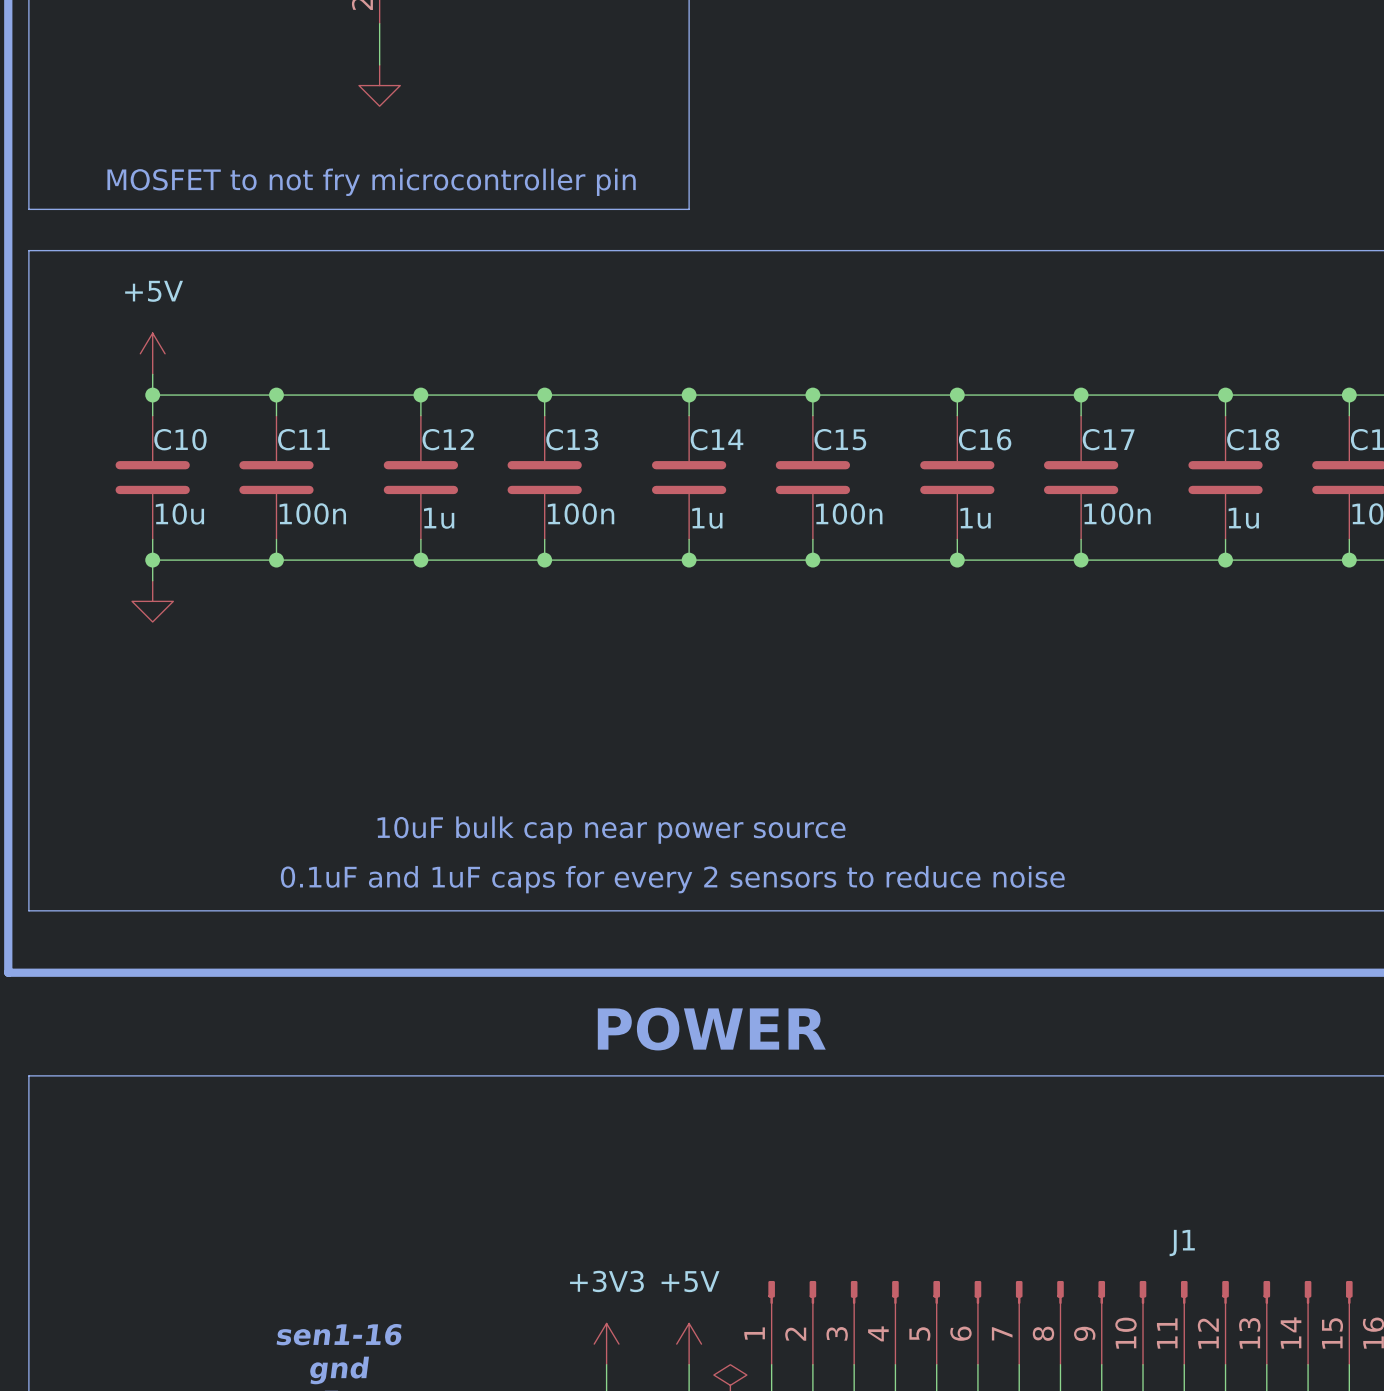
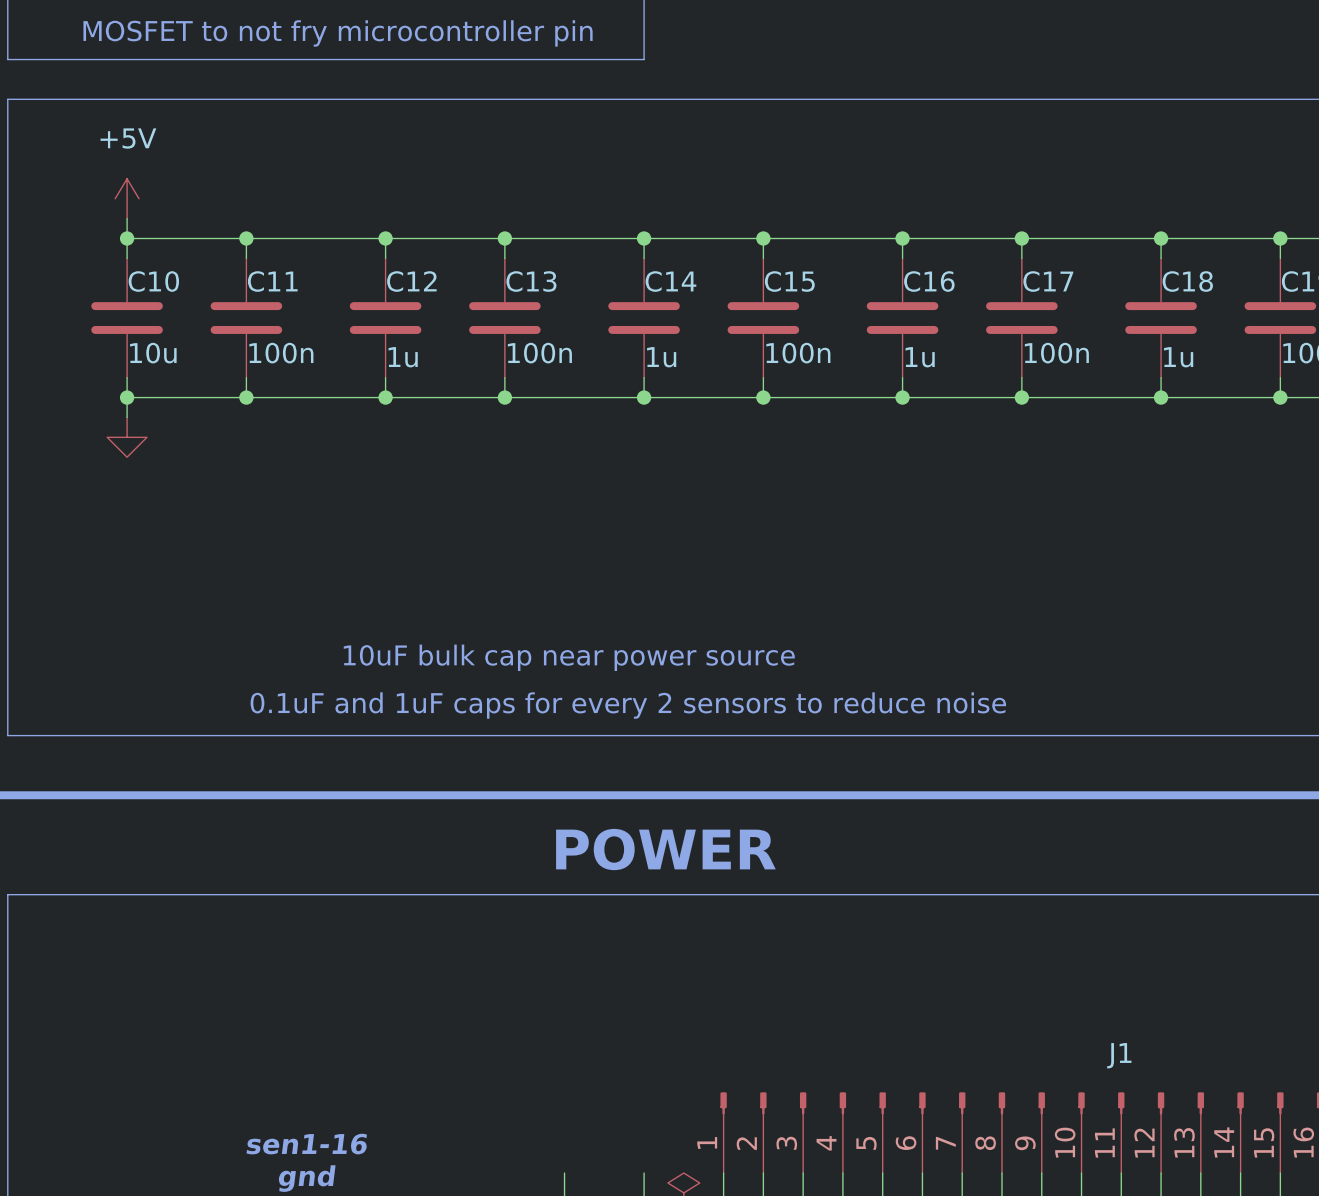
power symbol: +3V3 (606, 1344) -> none
power symbol: +5V (689, 1344) -> none

